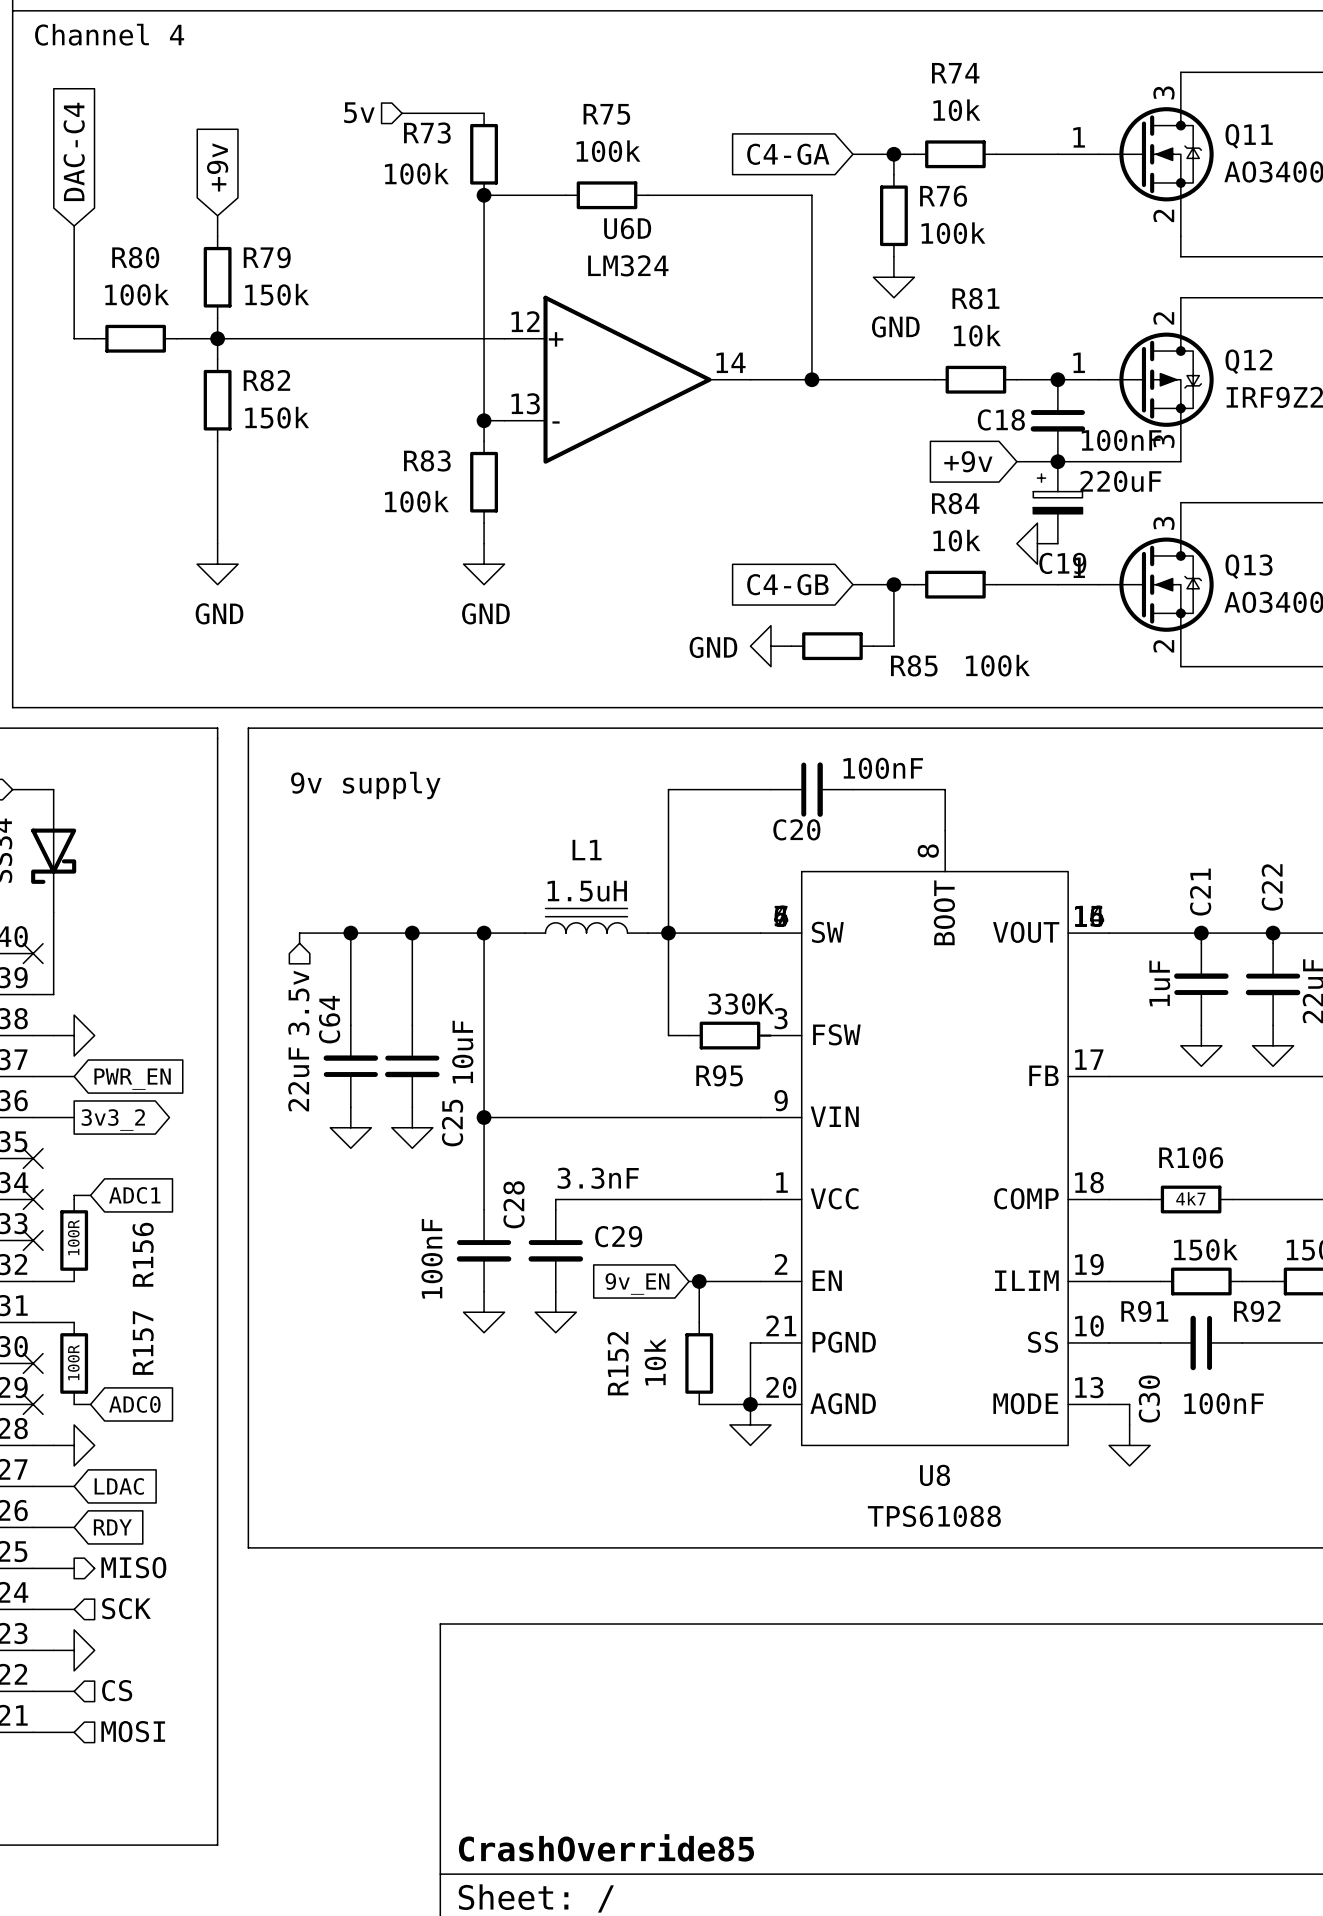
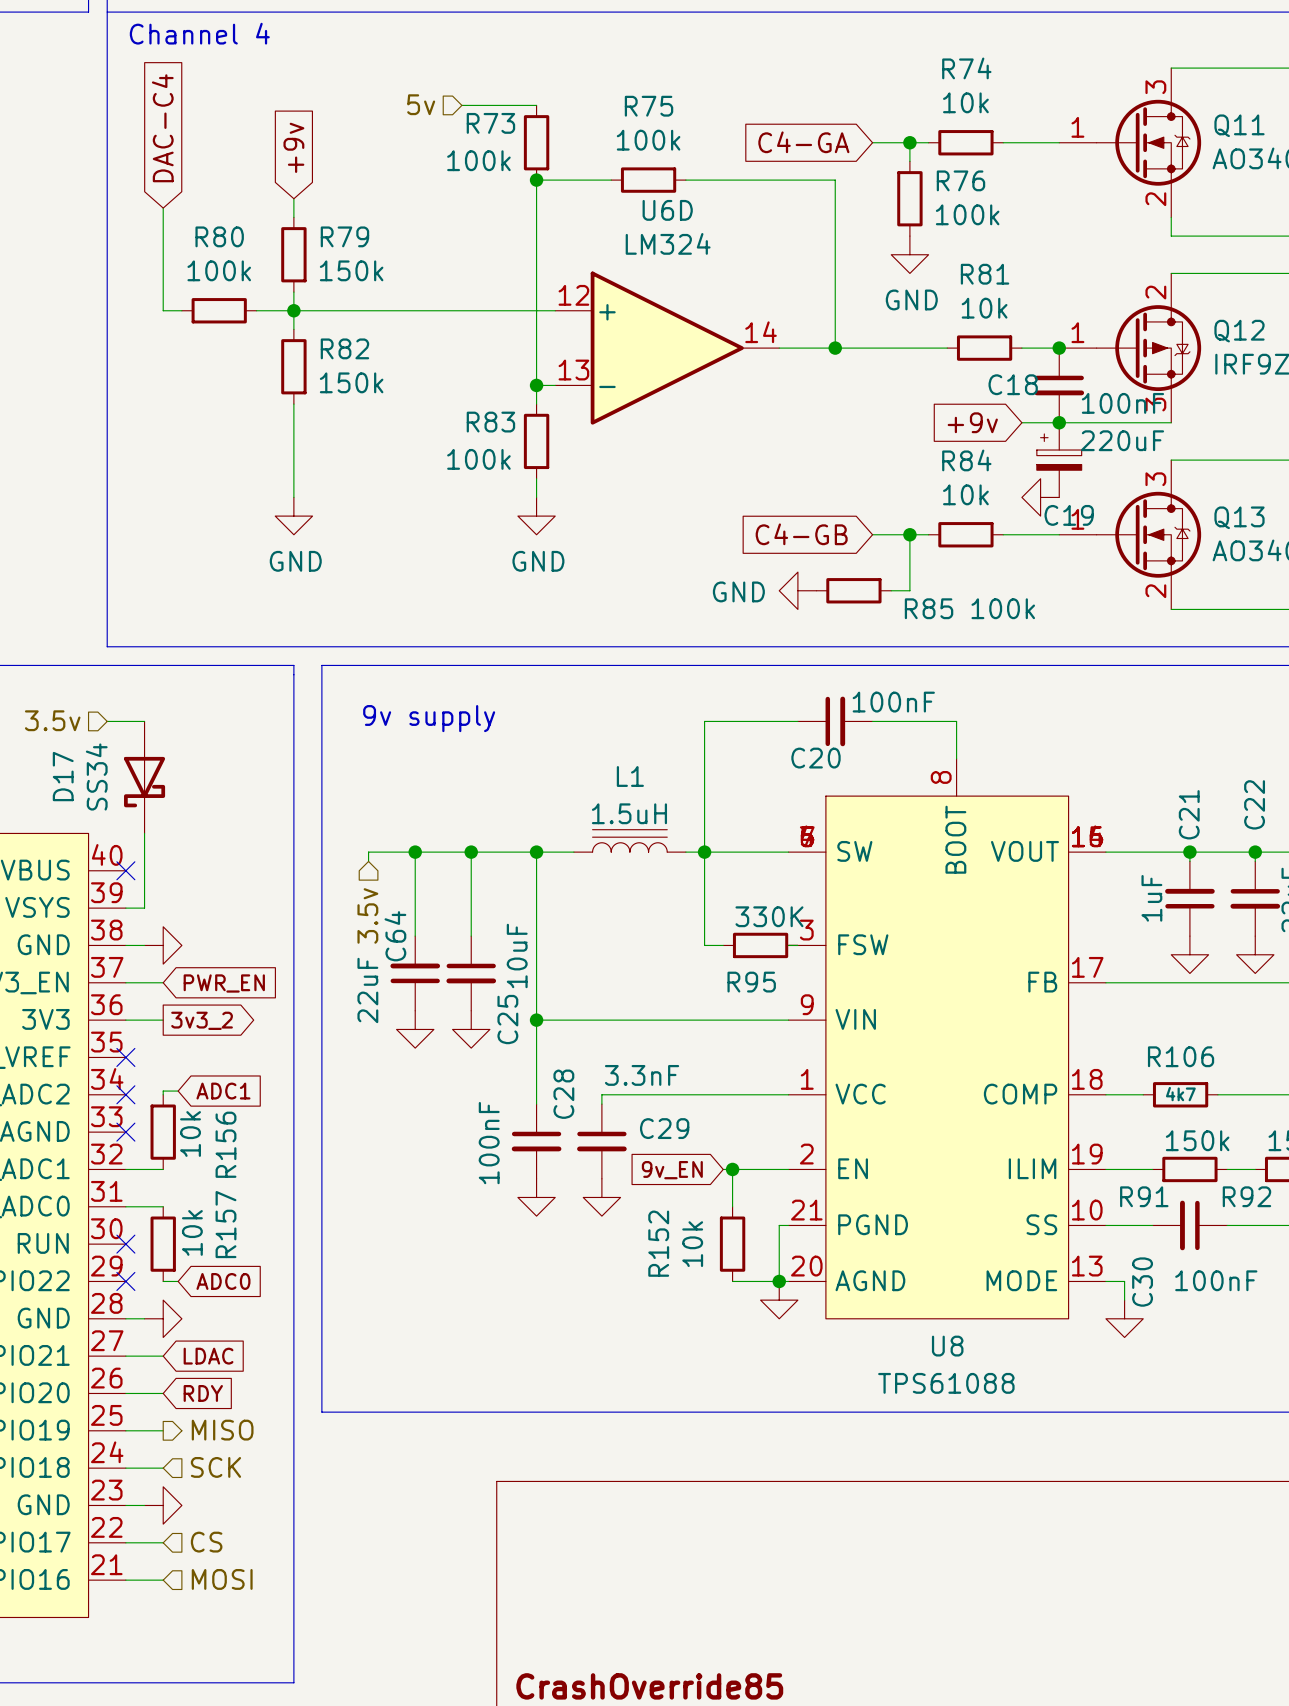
R156 value: 100R (73, 1237) -> 10k (190, 1133)
R157 value: 100R (73, 1362) -> 10k (192, 1232)

